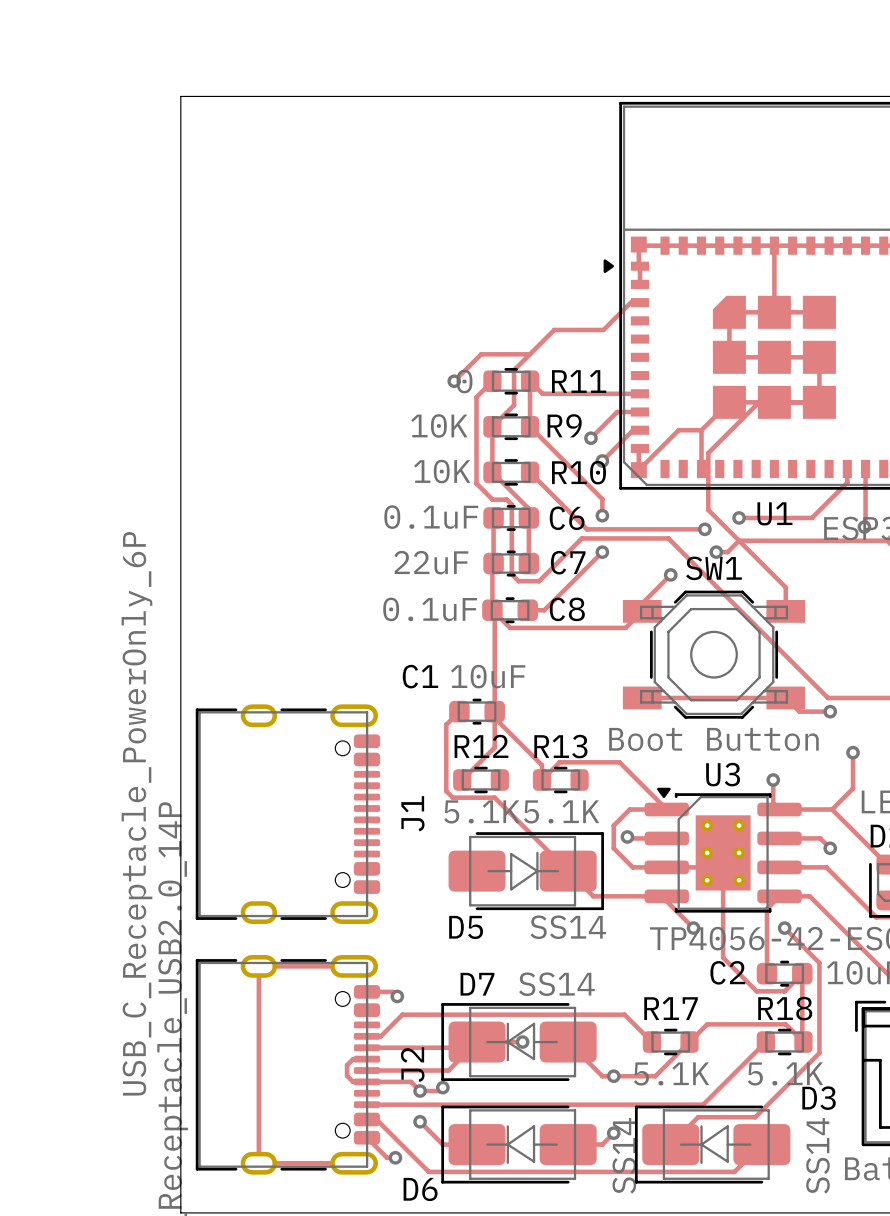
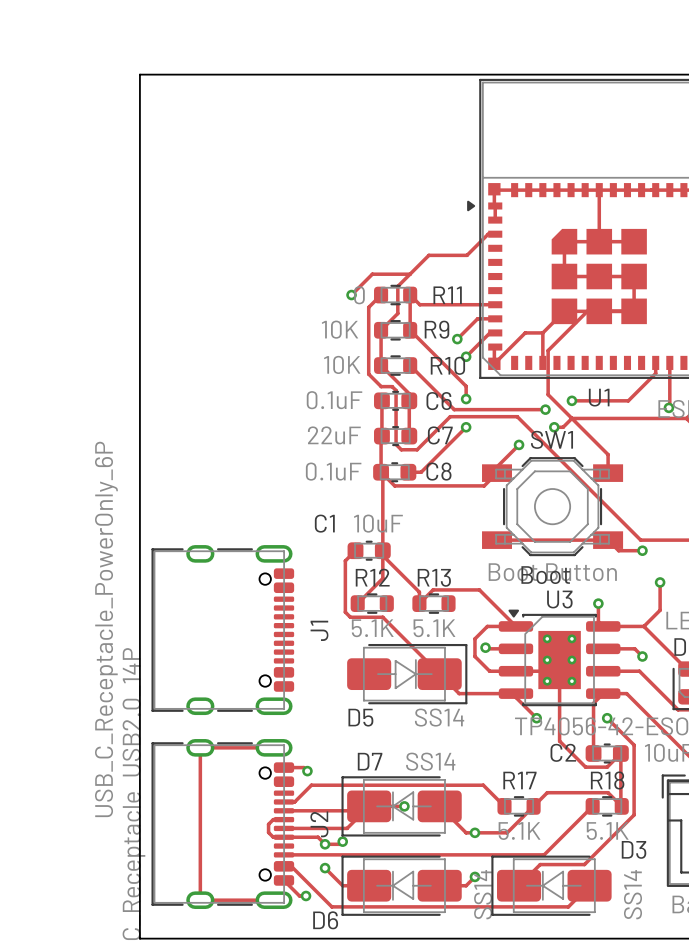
text: none -> Boot (545, 575)

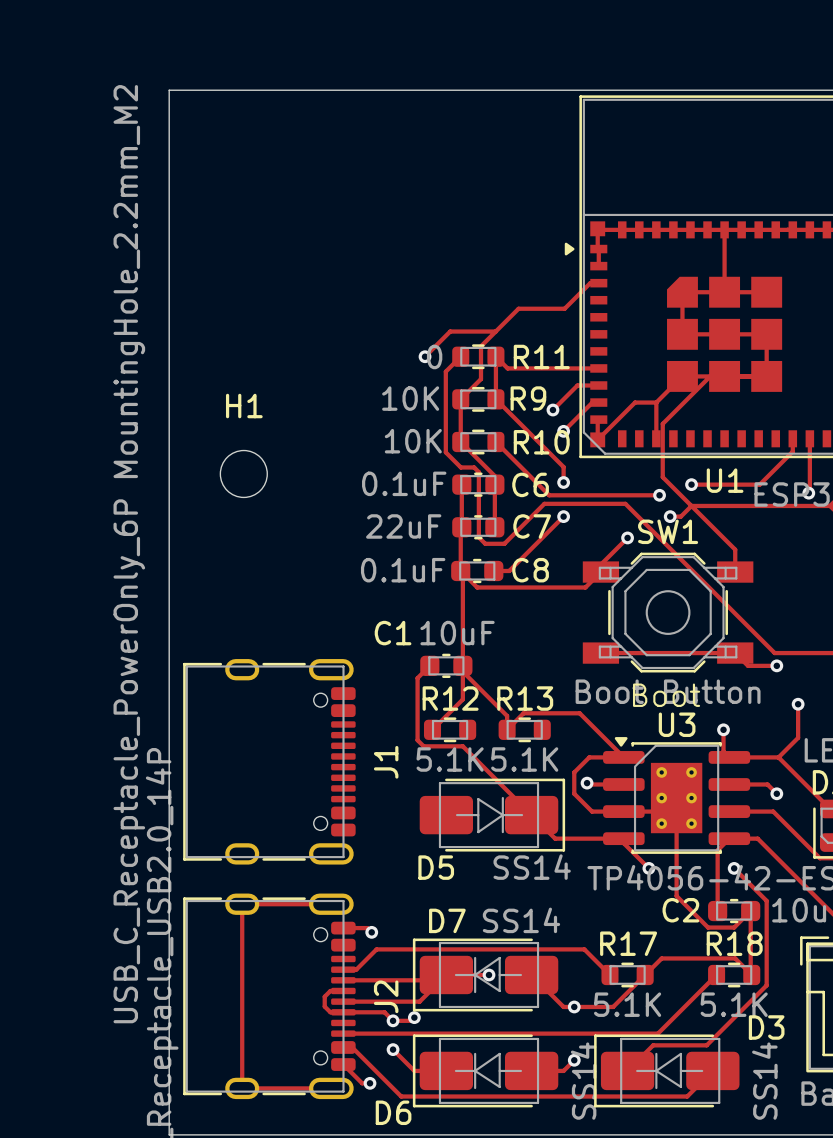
H1: none -> MountingHole_2.2mm_M2 (243, 473)

